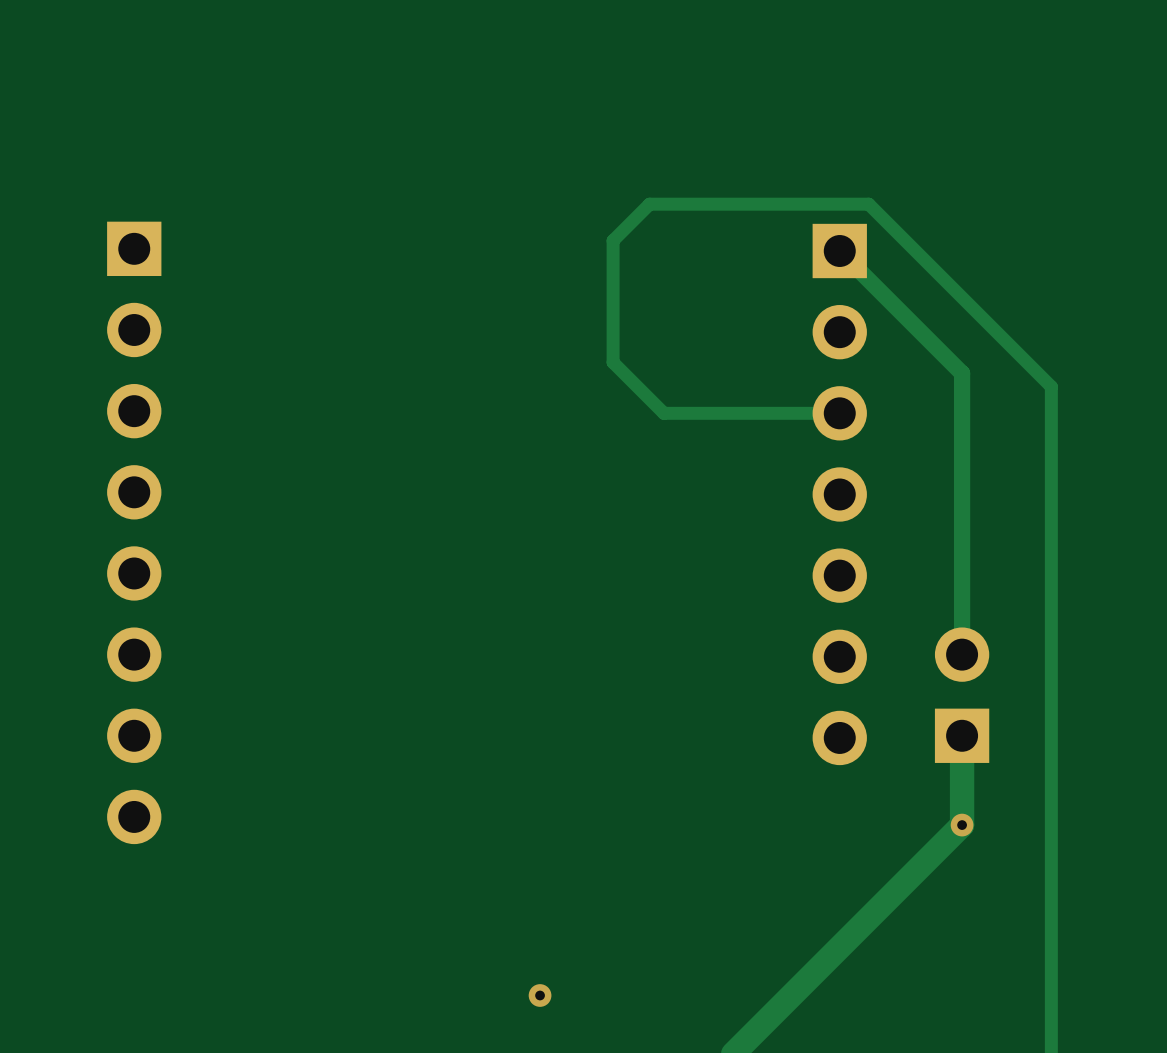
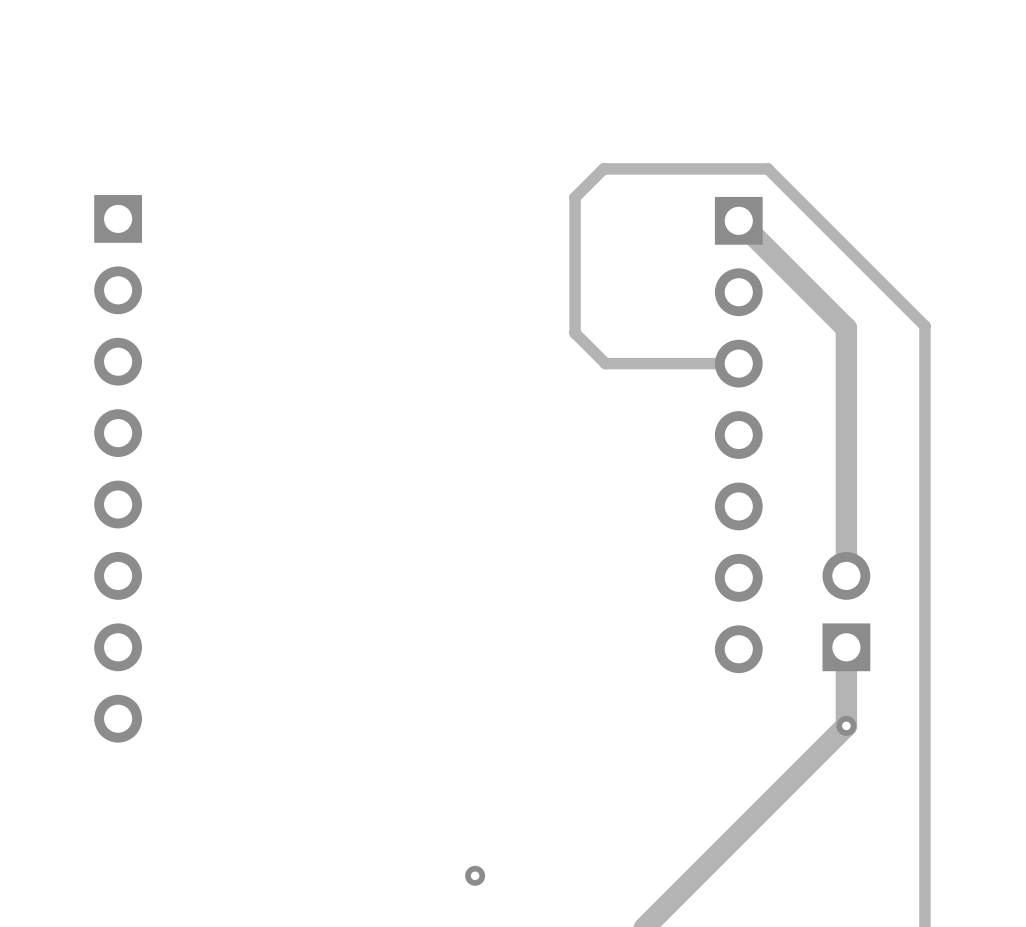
track width: thin (839, 251) (962, 373) (962, 654) -> thick (738, 220) (846, 328) (846, 575)
track: (1051, 386) (868, 204) (649, 204) (613, 240) (613, 362) (663, 413) (688, 413) -> (924, 340) (924, 326) (767, 168) (603, 168) (575, 197) (575, 333) (605, 363)

